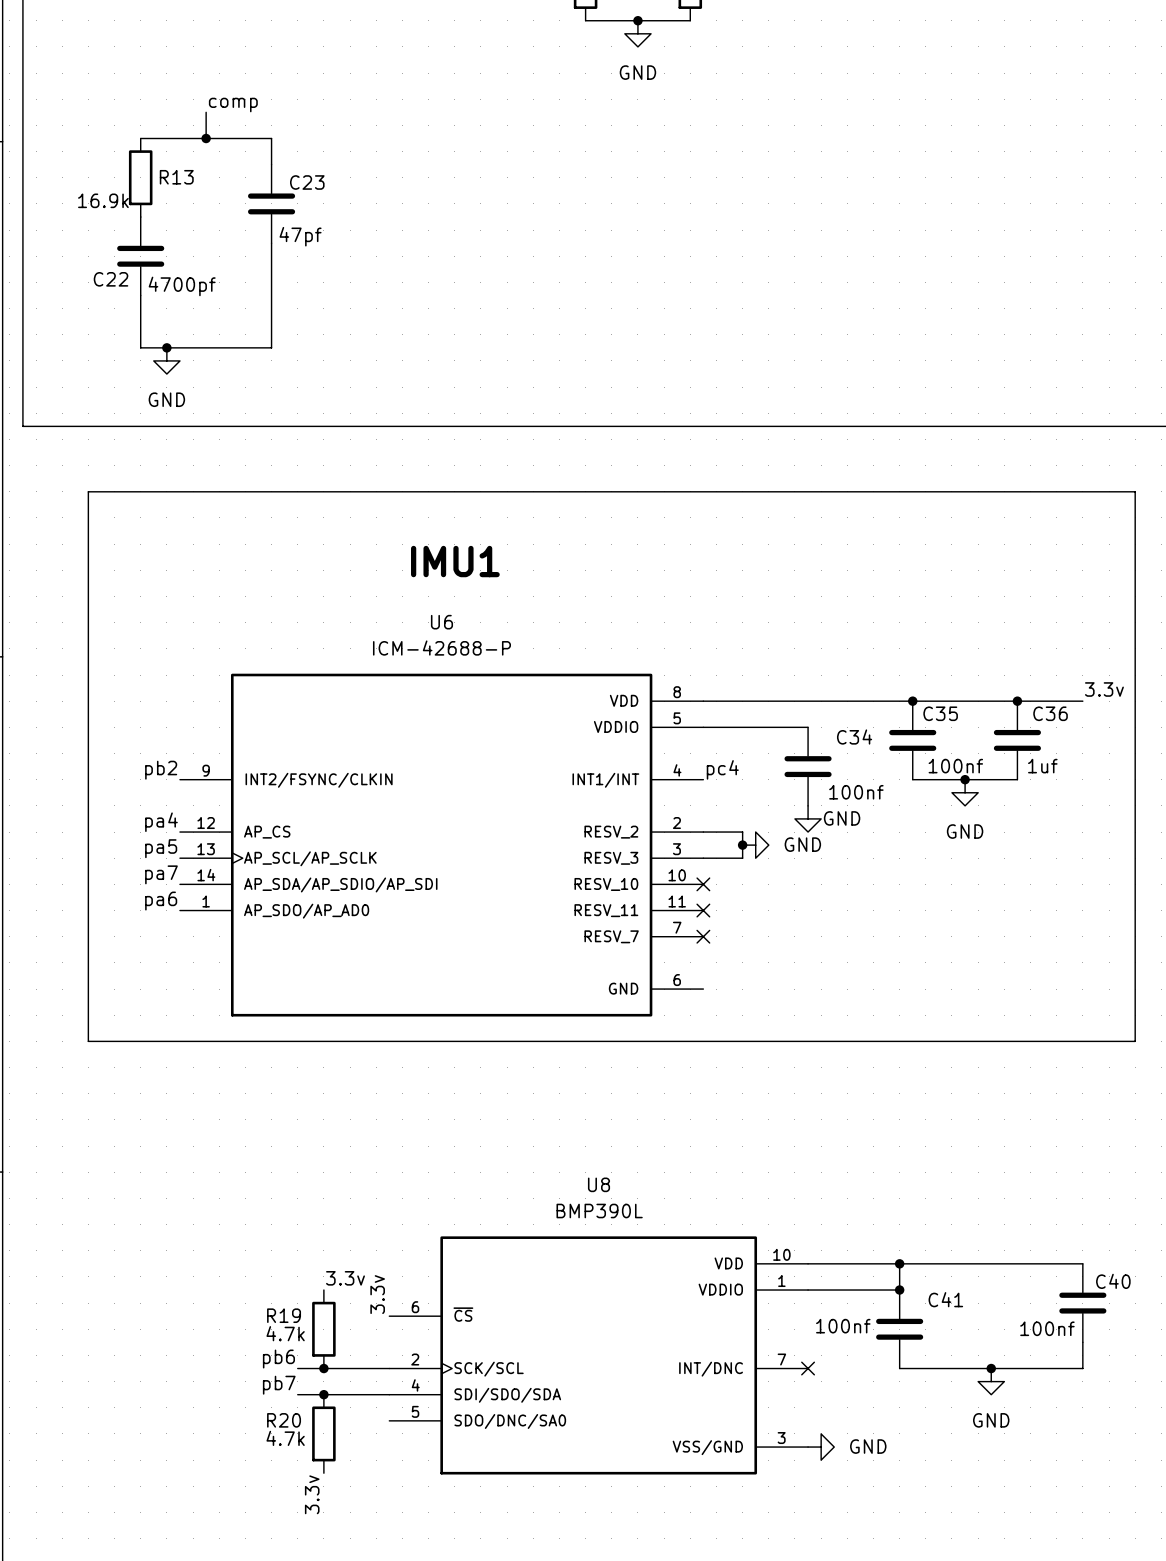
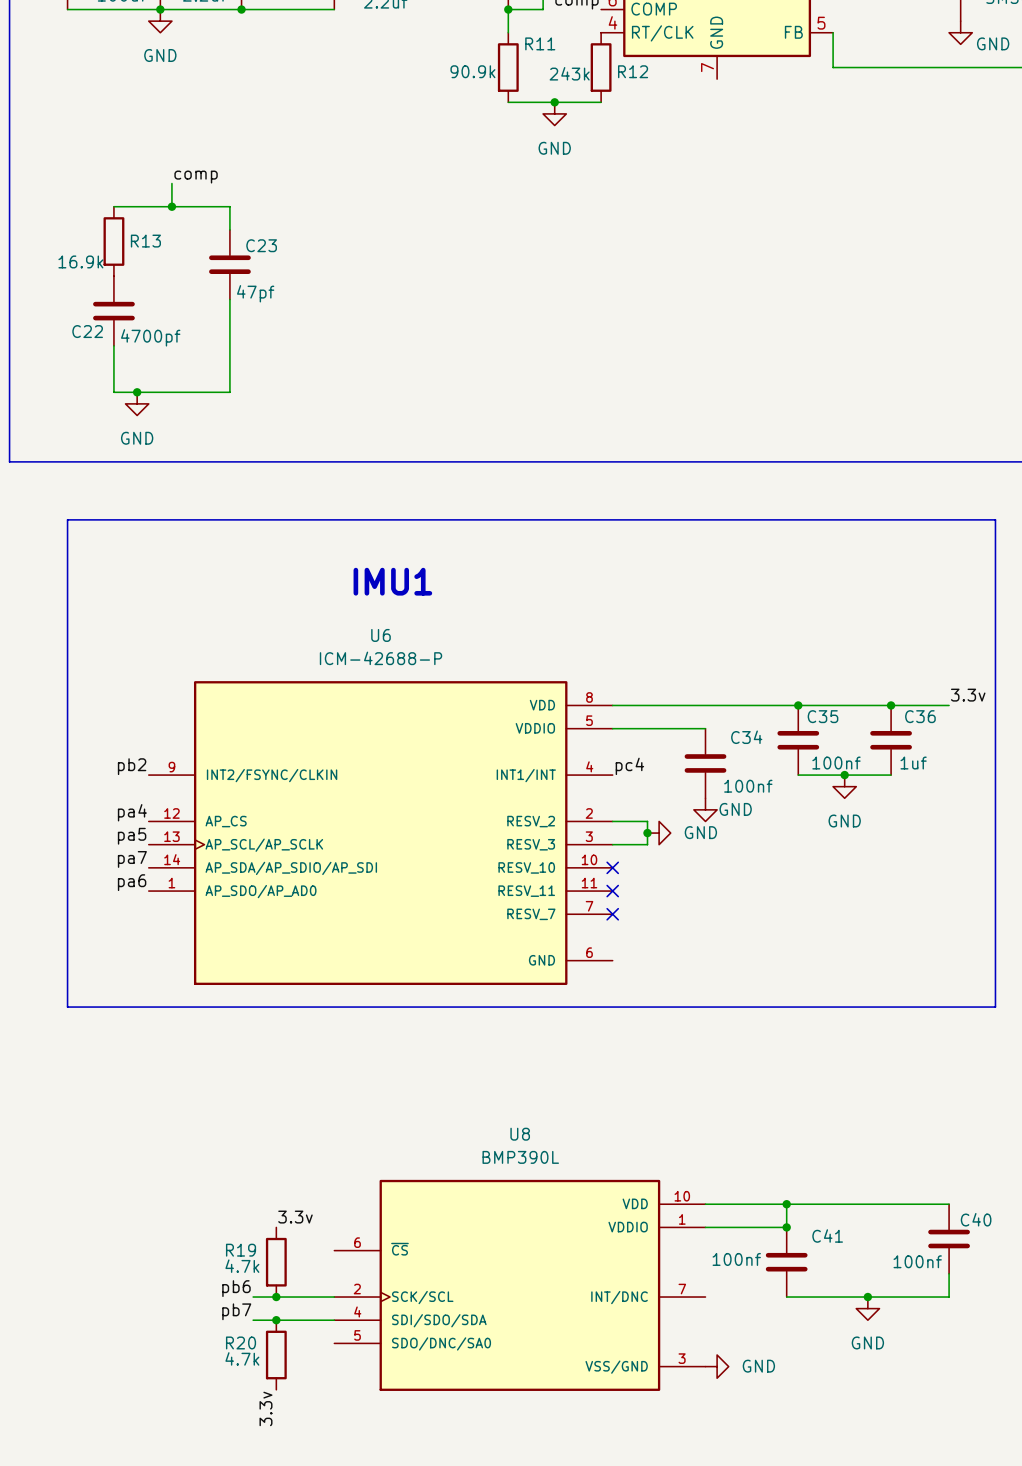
label: 3.3v (377, 1294) -> none
no-connect mark: (808, 1368) -> none

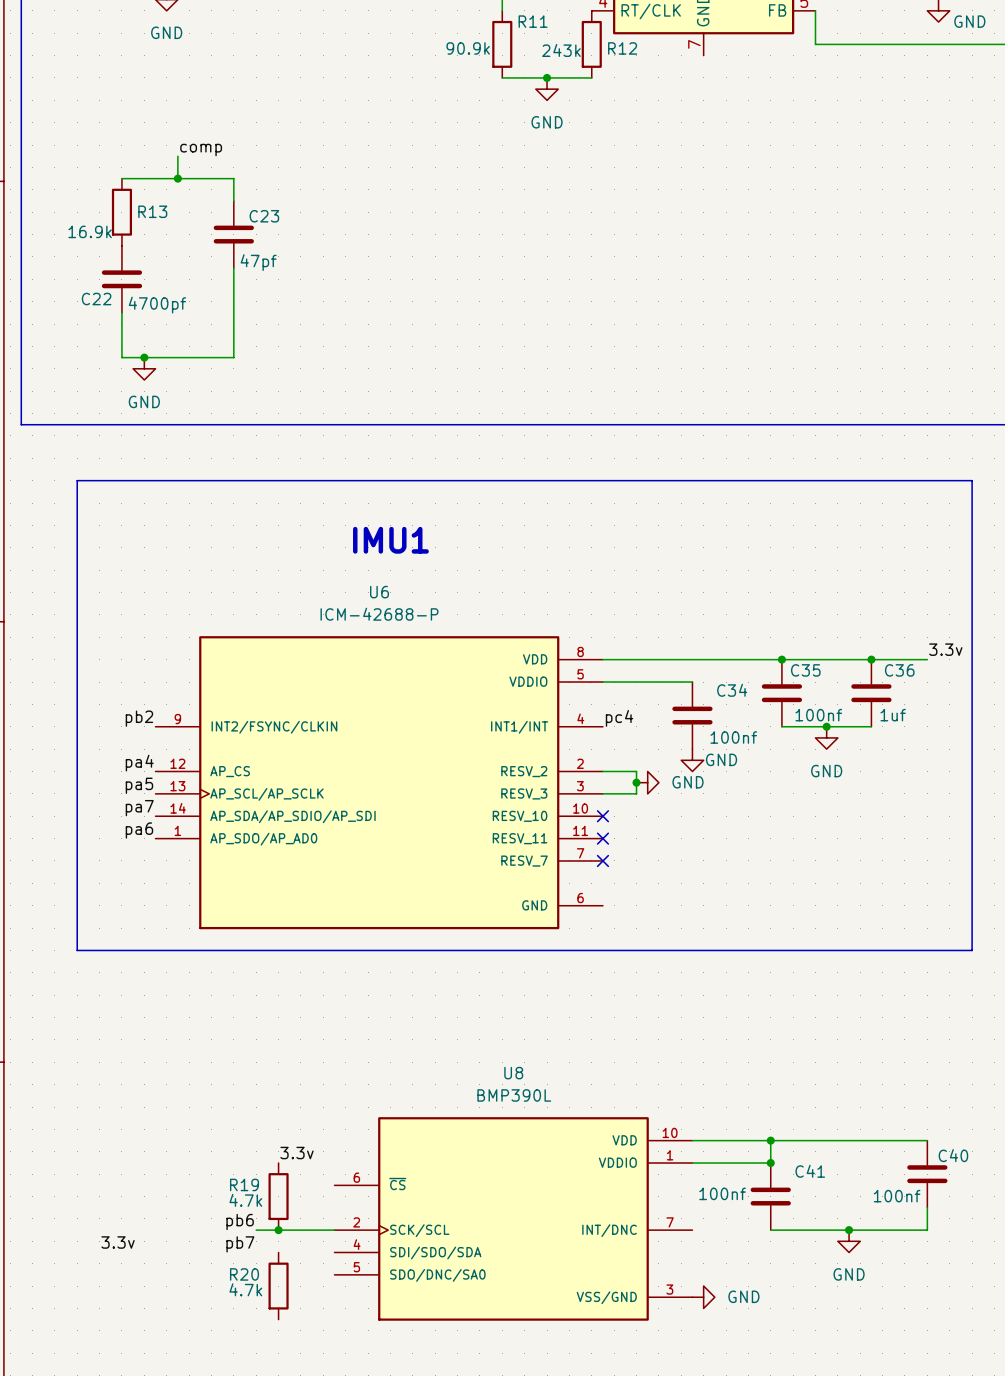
wire: (253, 1320) (334, 1320) -> none
junction: (276, 1320) -> none
label rotation: 0° (265, 1408) -> 90° clockwise (118, 1242)
label position: 3.3v (265, 1408) -> 3.3v (118, 1242)

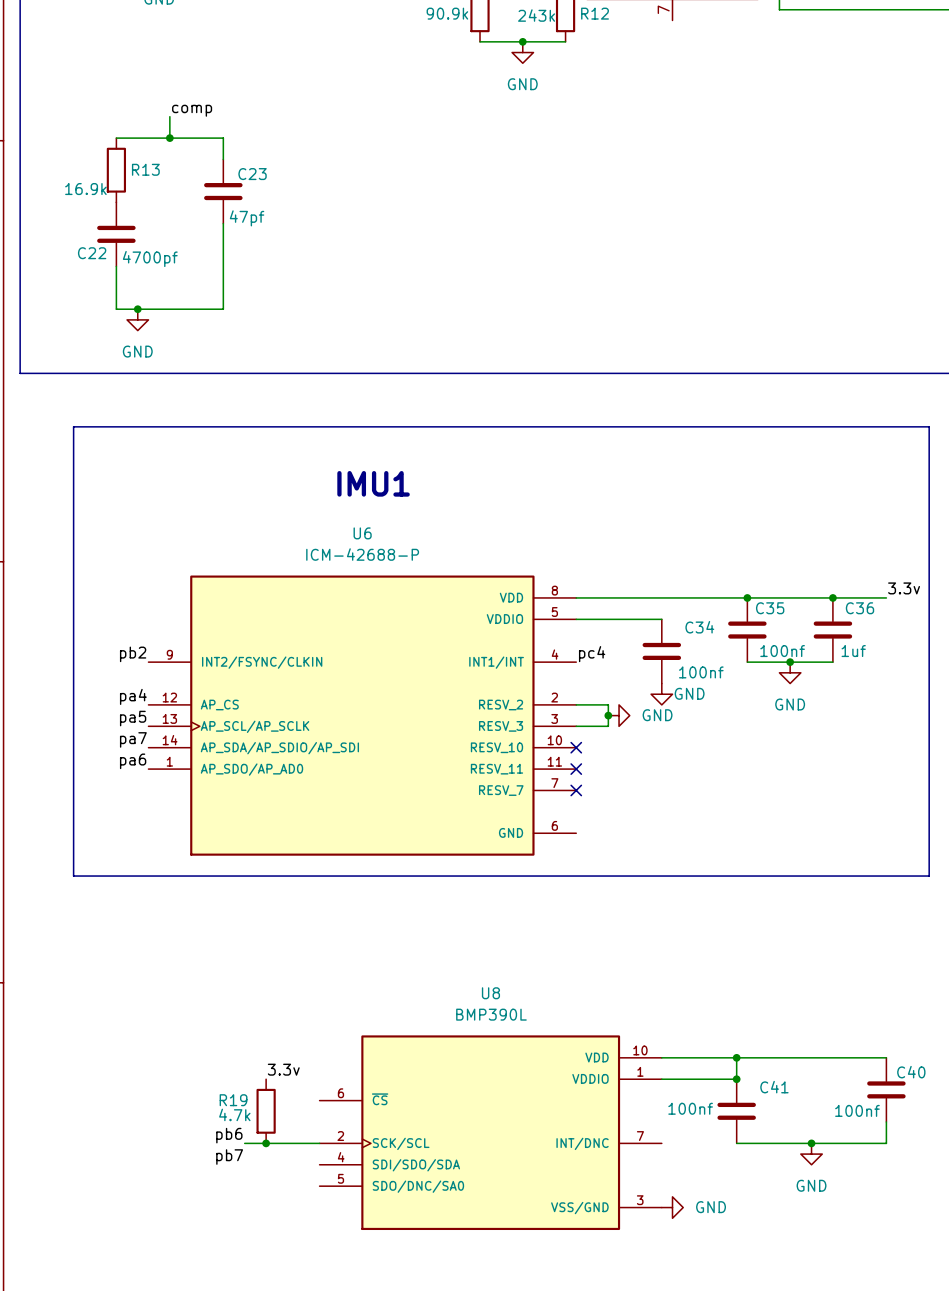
label: 3.3v (118, 1242) -> none
R20: 4.7k (278, 1286) -> none

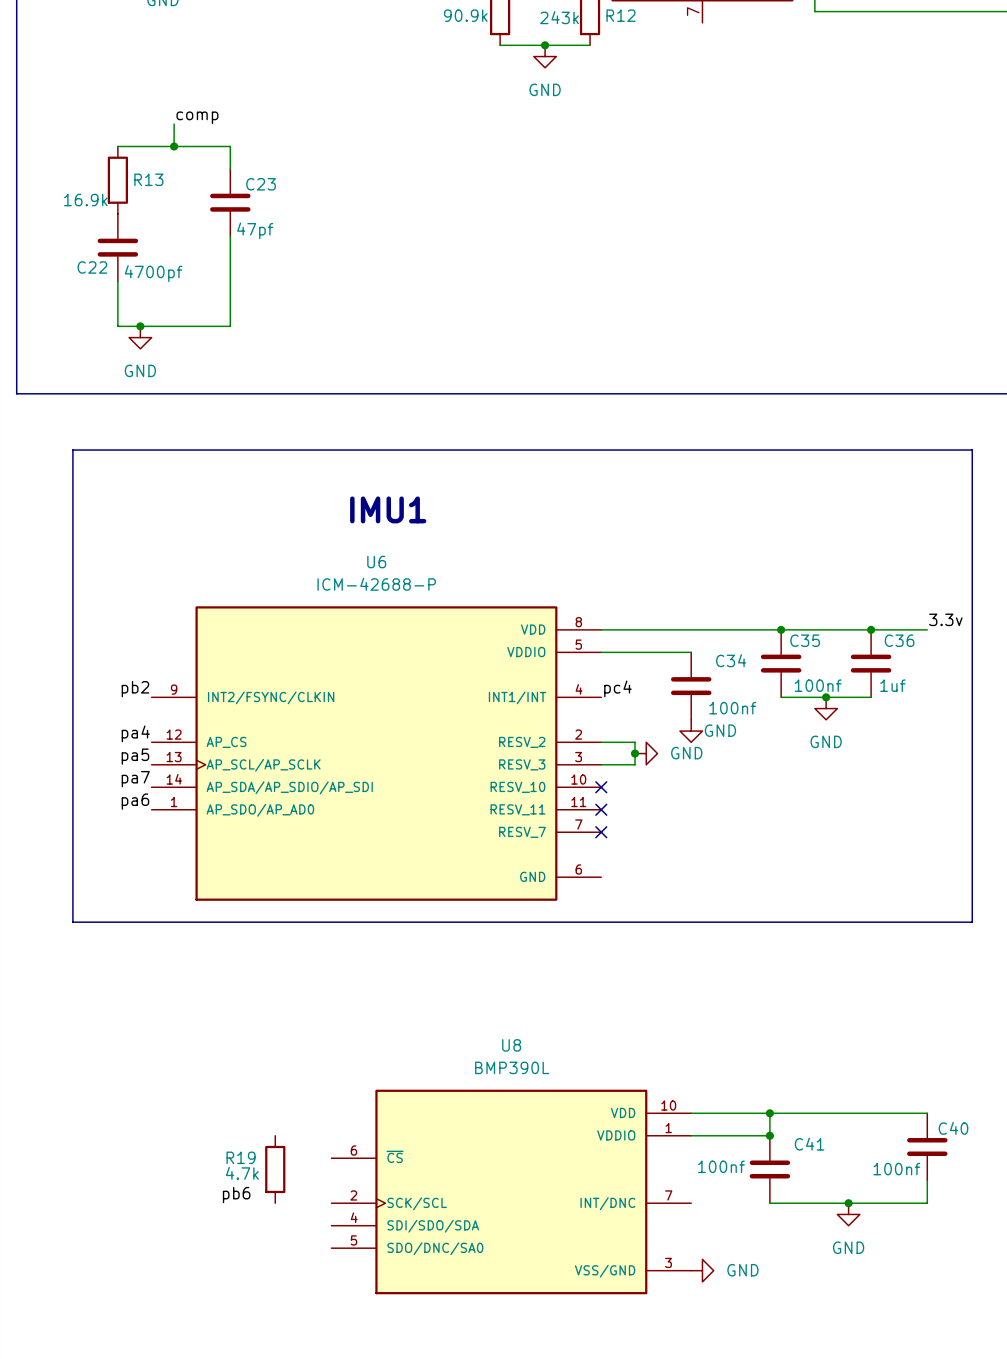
label: 3.3v (283, 1069) -> none
wire: (244, 1143) (319, 1143) -> none
junction: (266, 1143) -> none
label: pb7 (229, 1157) -> none

